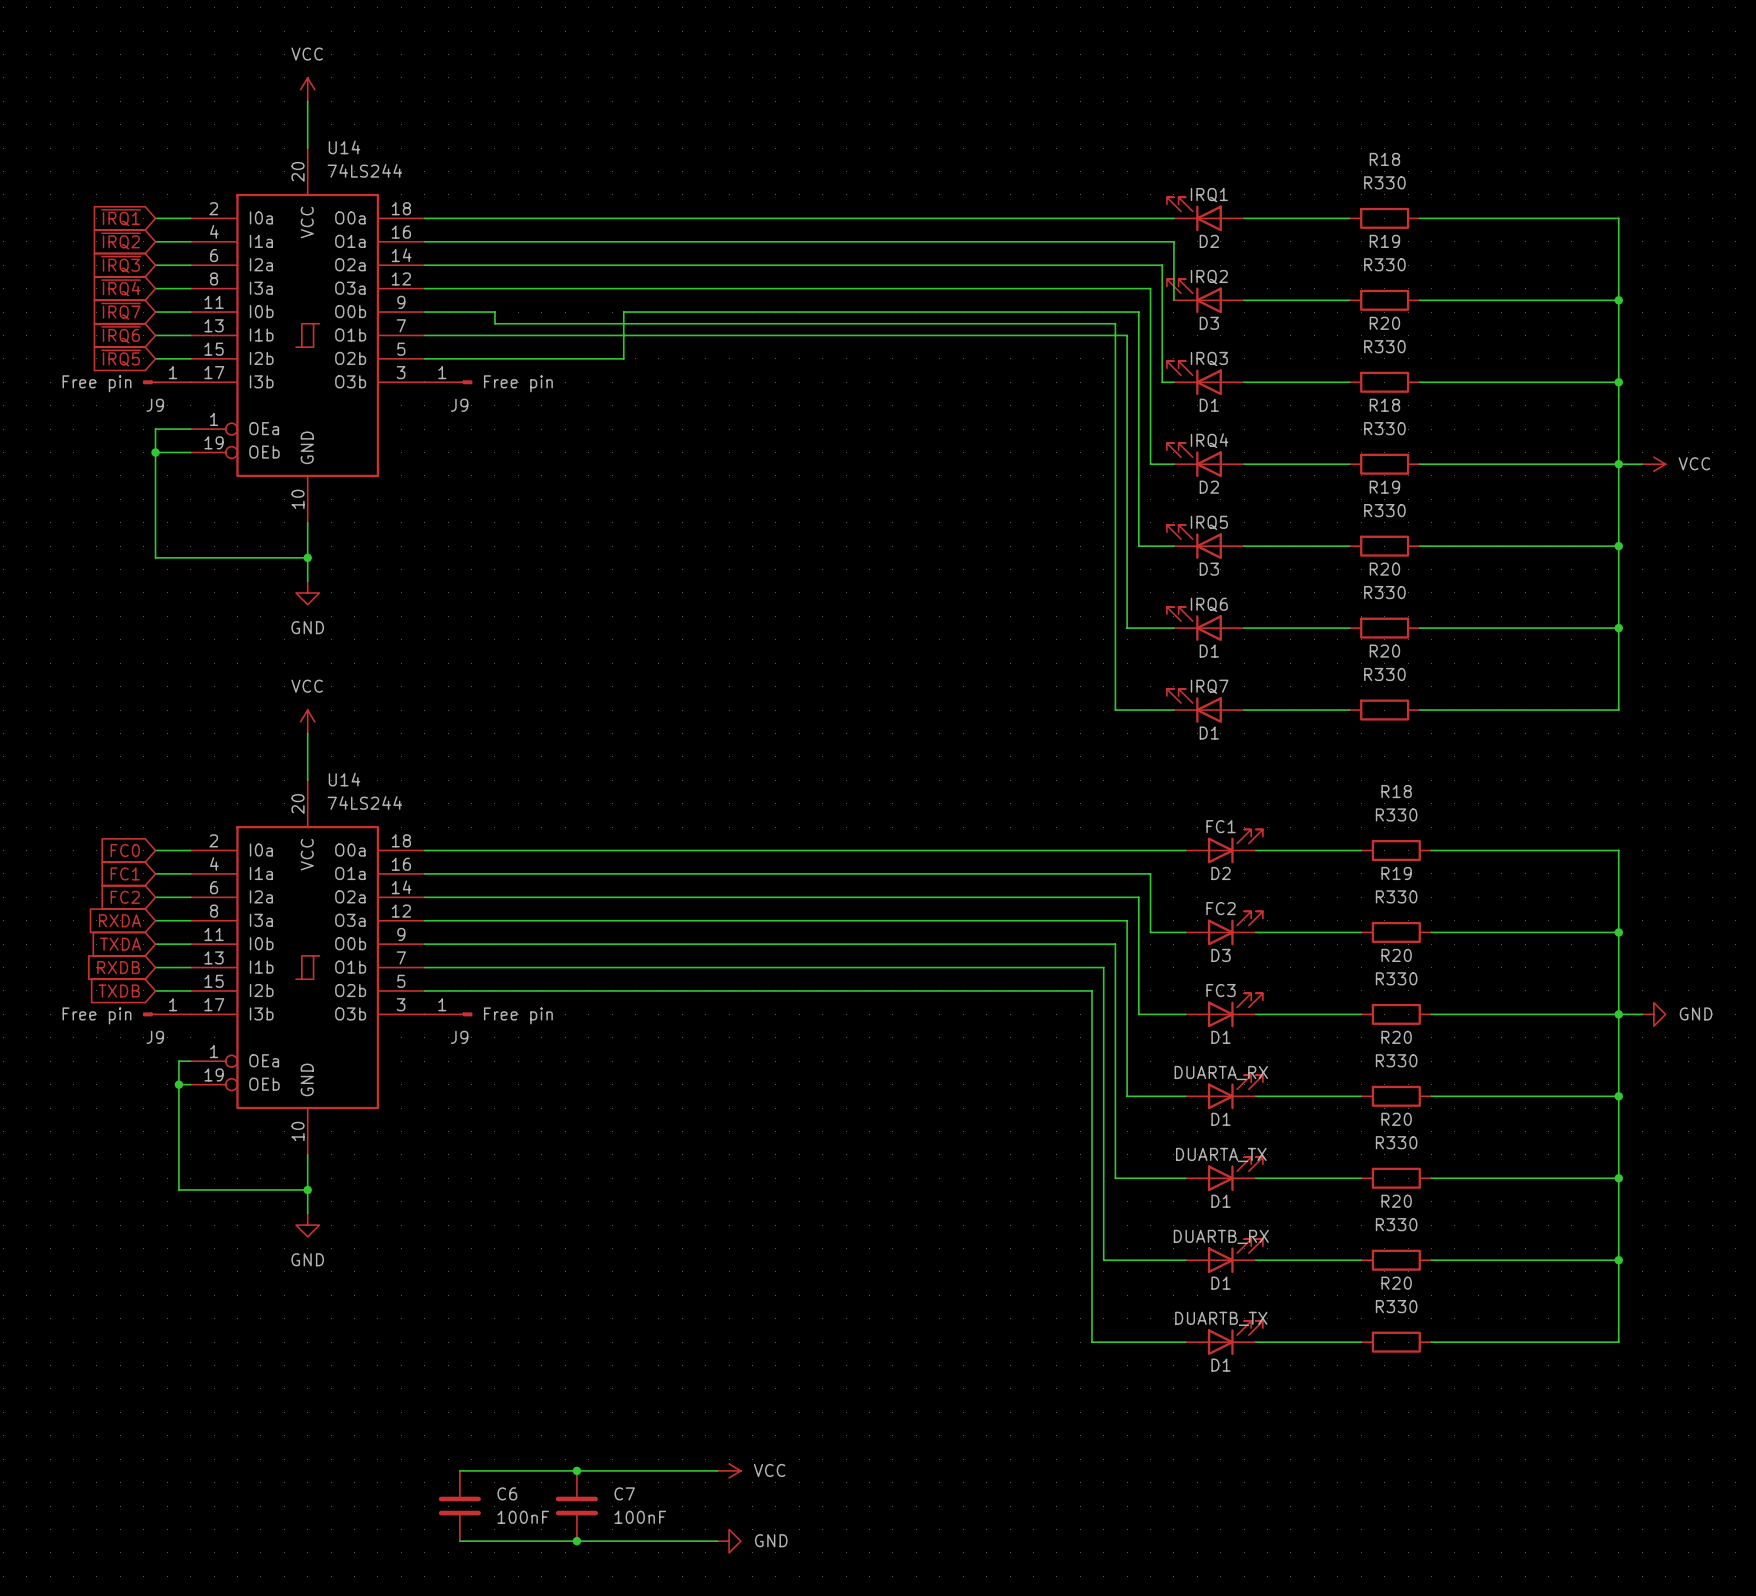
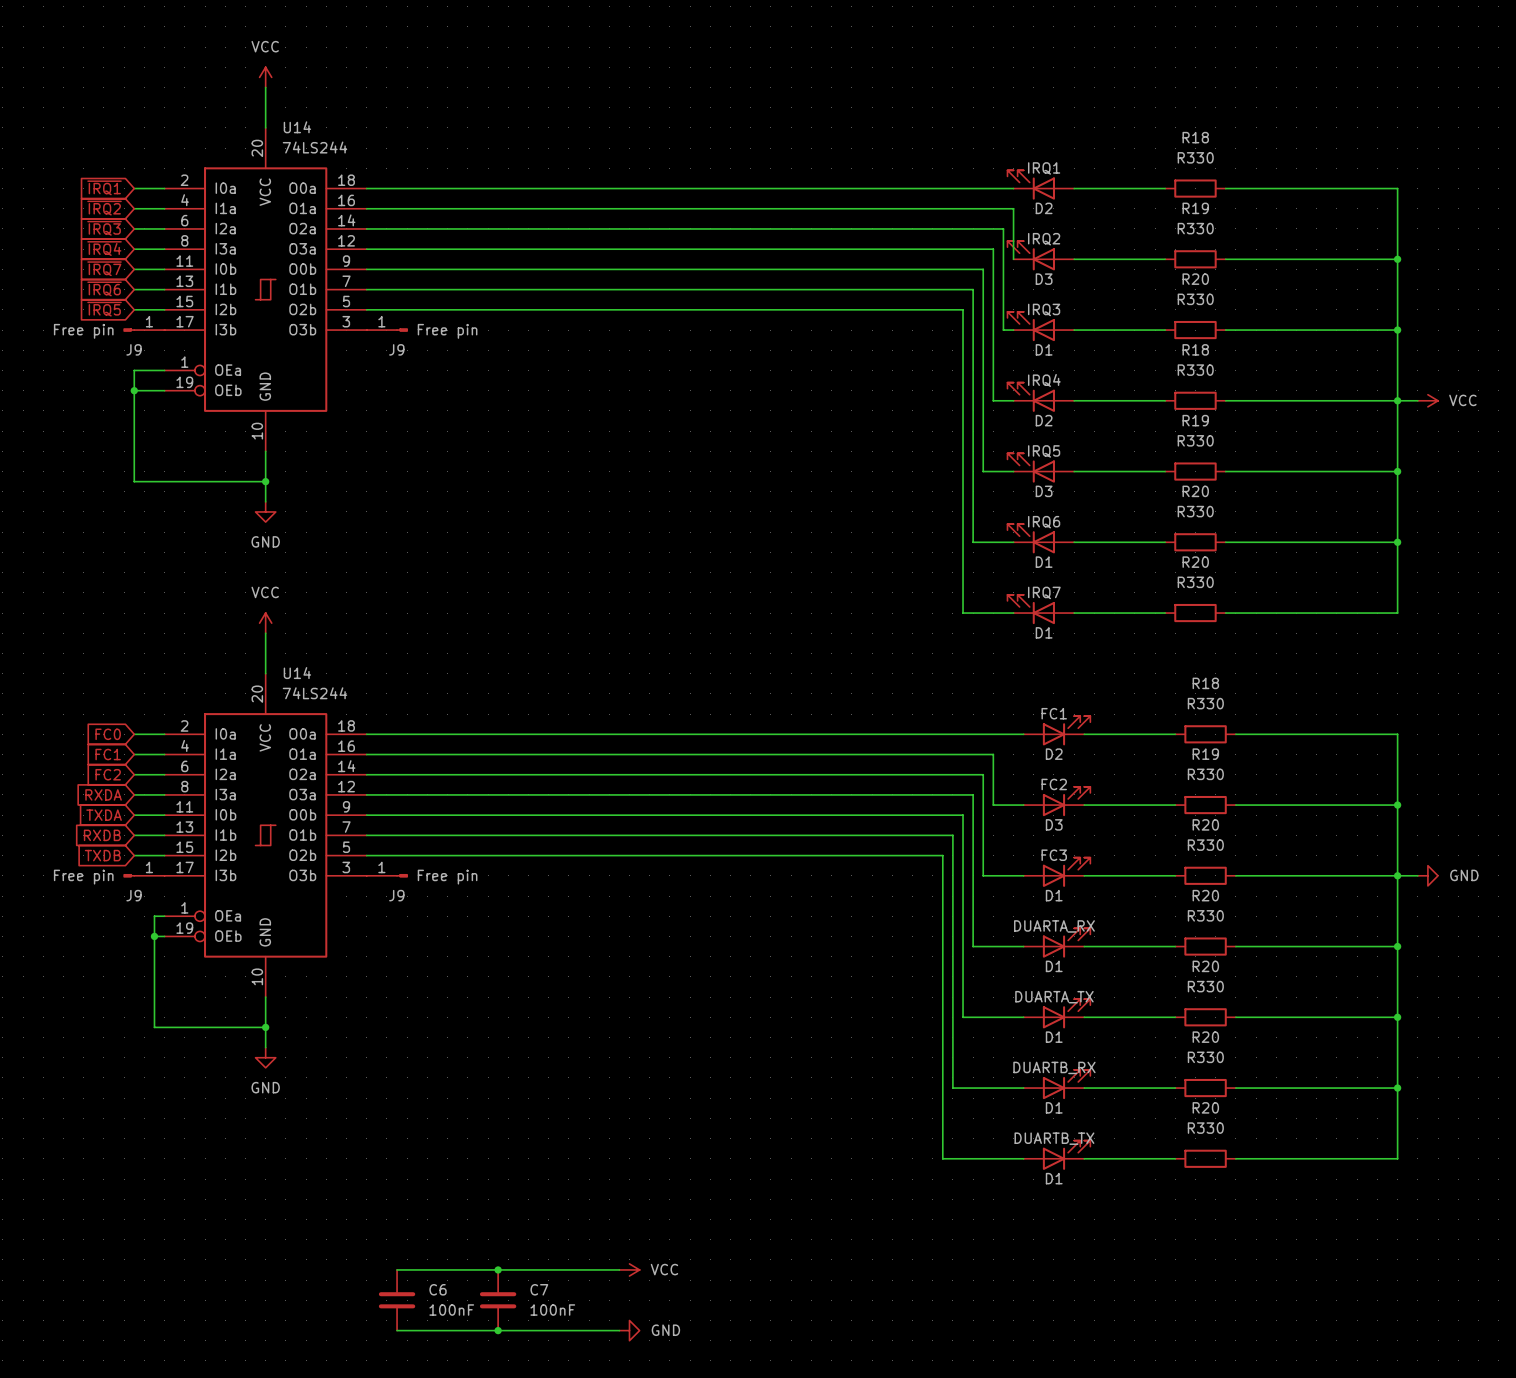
wire: (494, 312) (494, 323) (1115, 323) (1115, 358) -> (538, 309) (963, 309)
wire: (623, 312) (623, 358) -> (538, 269) (427, 269)

